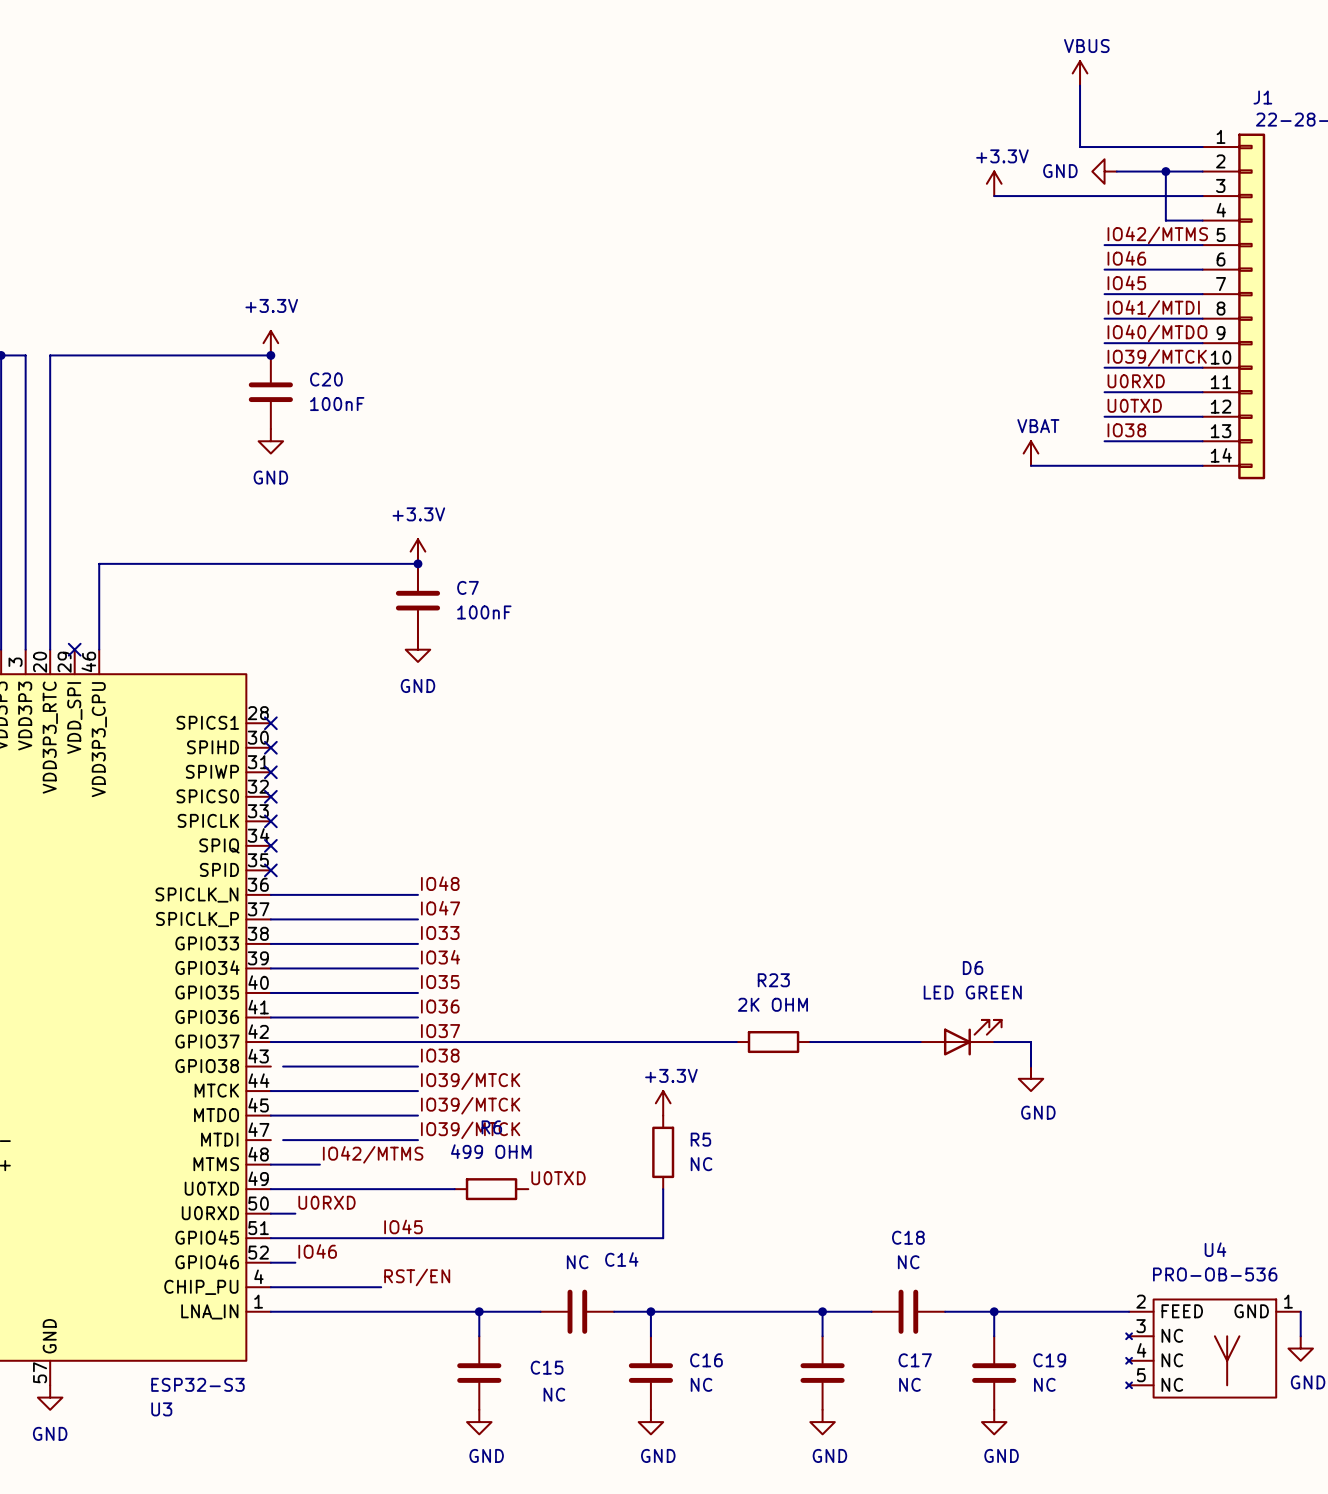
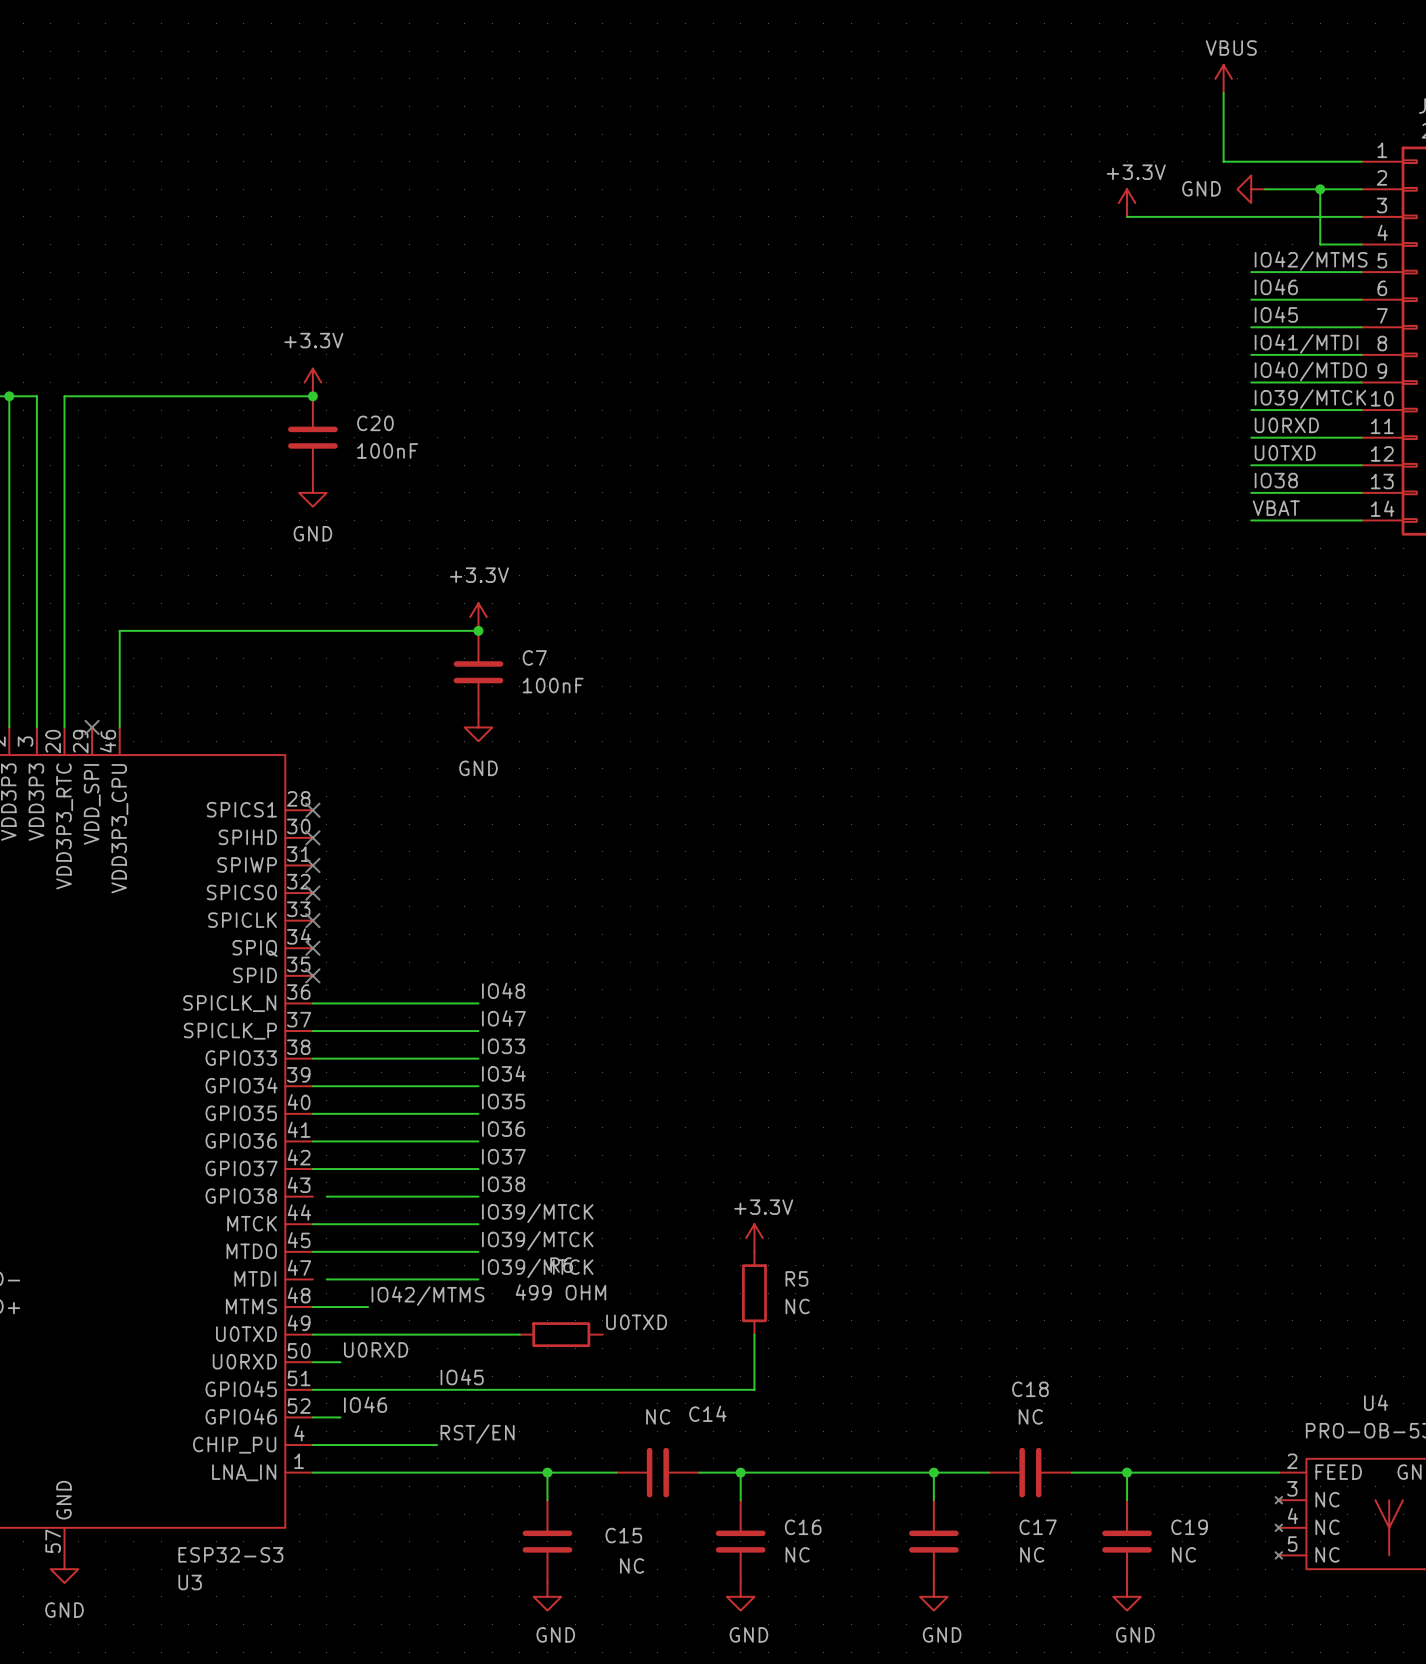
power symbol: VBAT (1031, 453) -> none
label: none -> VBAT (1276, 508)
wire: (1031, 465) (1104, 465) -> none
D6: LED GREEN (961, 1037) -> none
wire: (417, 1042) (736, 1042) -> none
R23: 2K OHM (773, 1042) -> none
wire: (810, 1042) (920, 1042) -> none
wire: (994, 1042) (1031, 1042) (1031, 1066) -> none
power symbol: GND (1031, 1078) -> none

